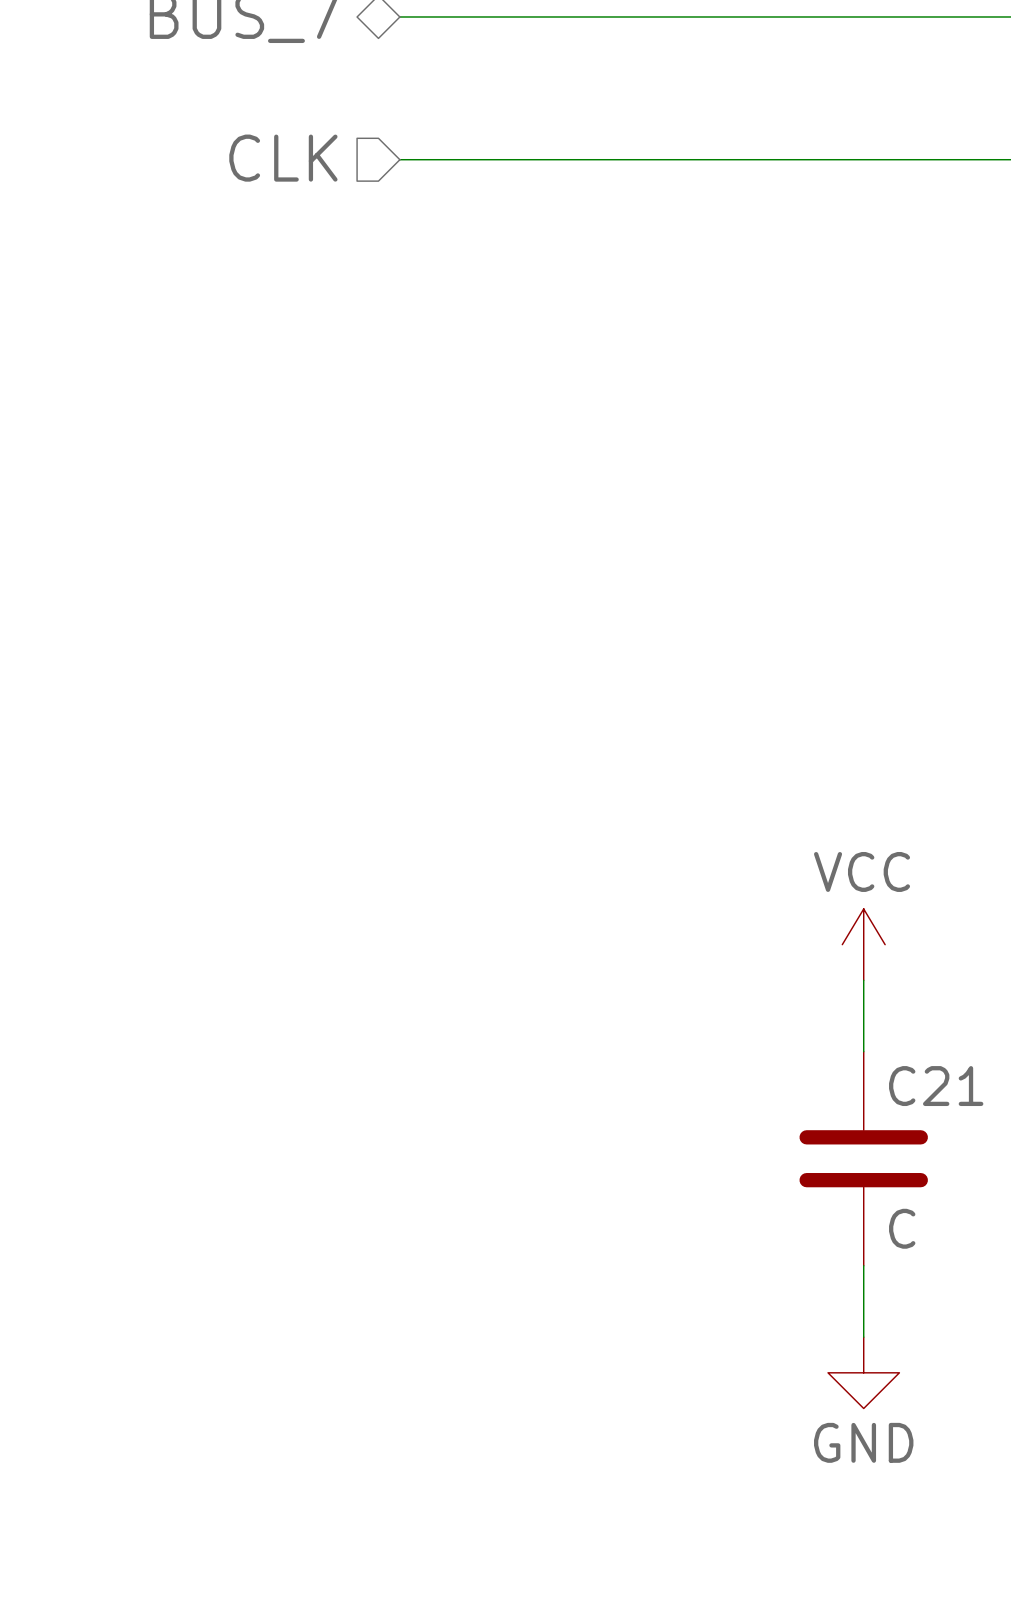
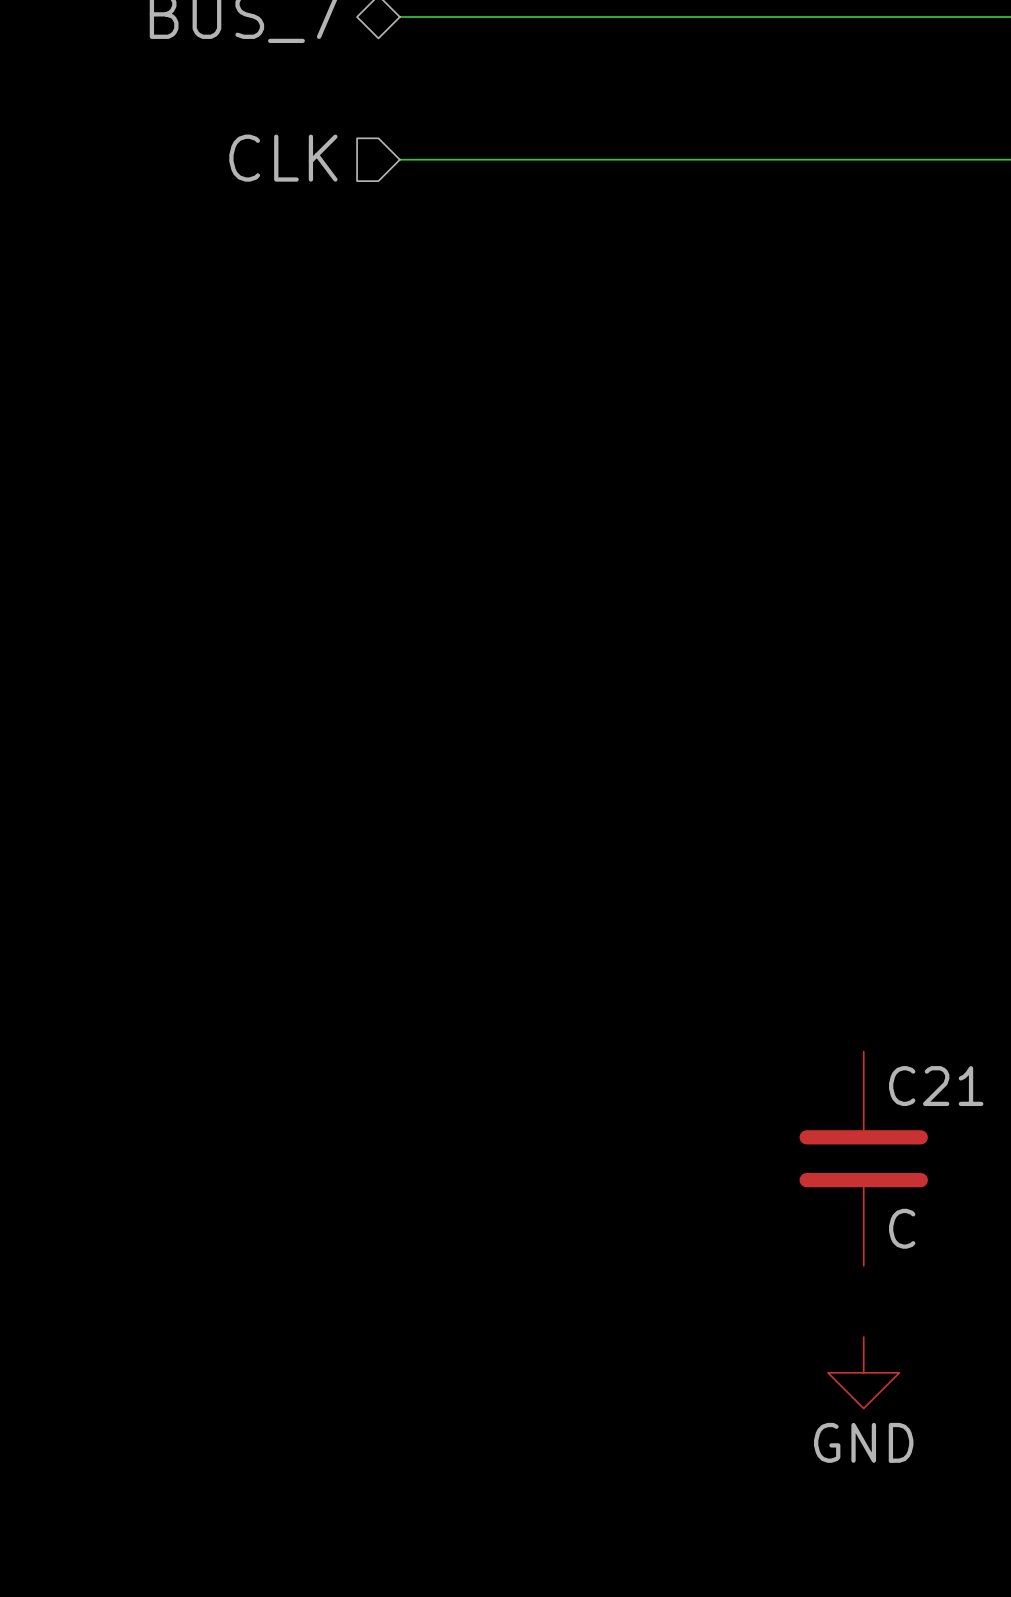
power symbol: VCC (863, 944) -> none
wire: (863, 980) (863, 1051) -> none
wire: (863, 1265) (863, 1337) -> none

